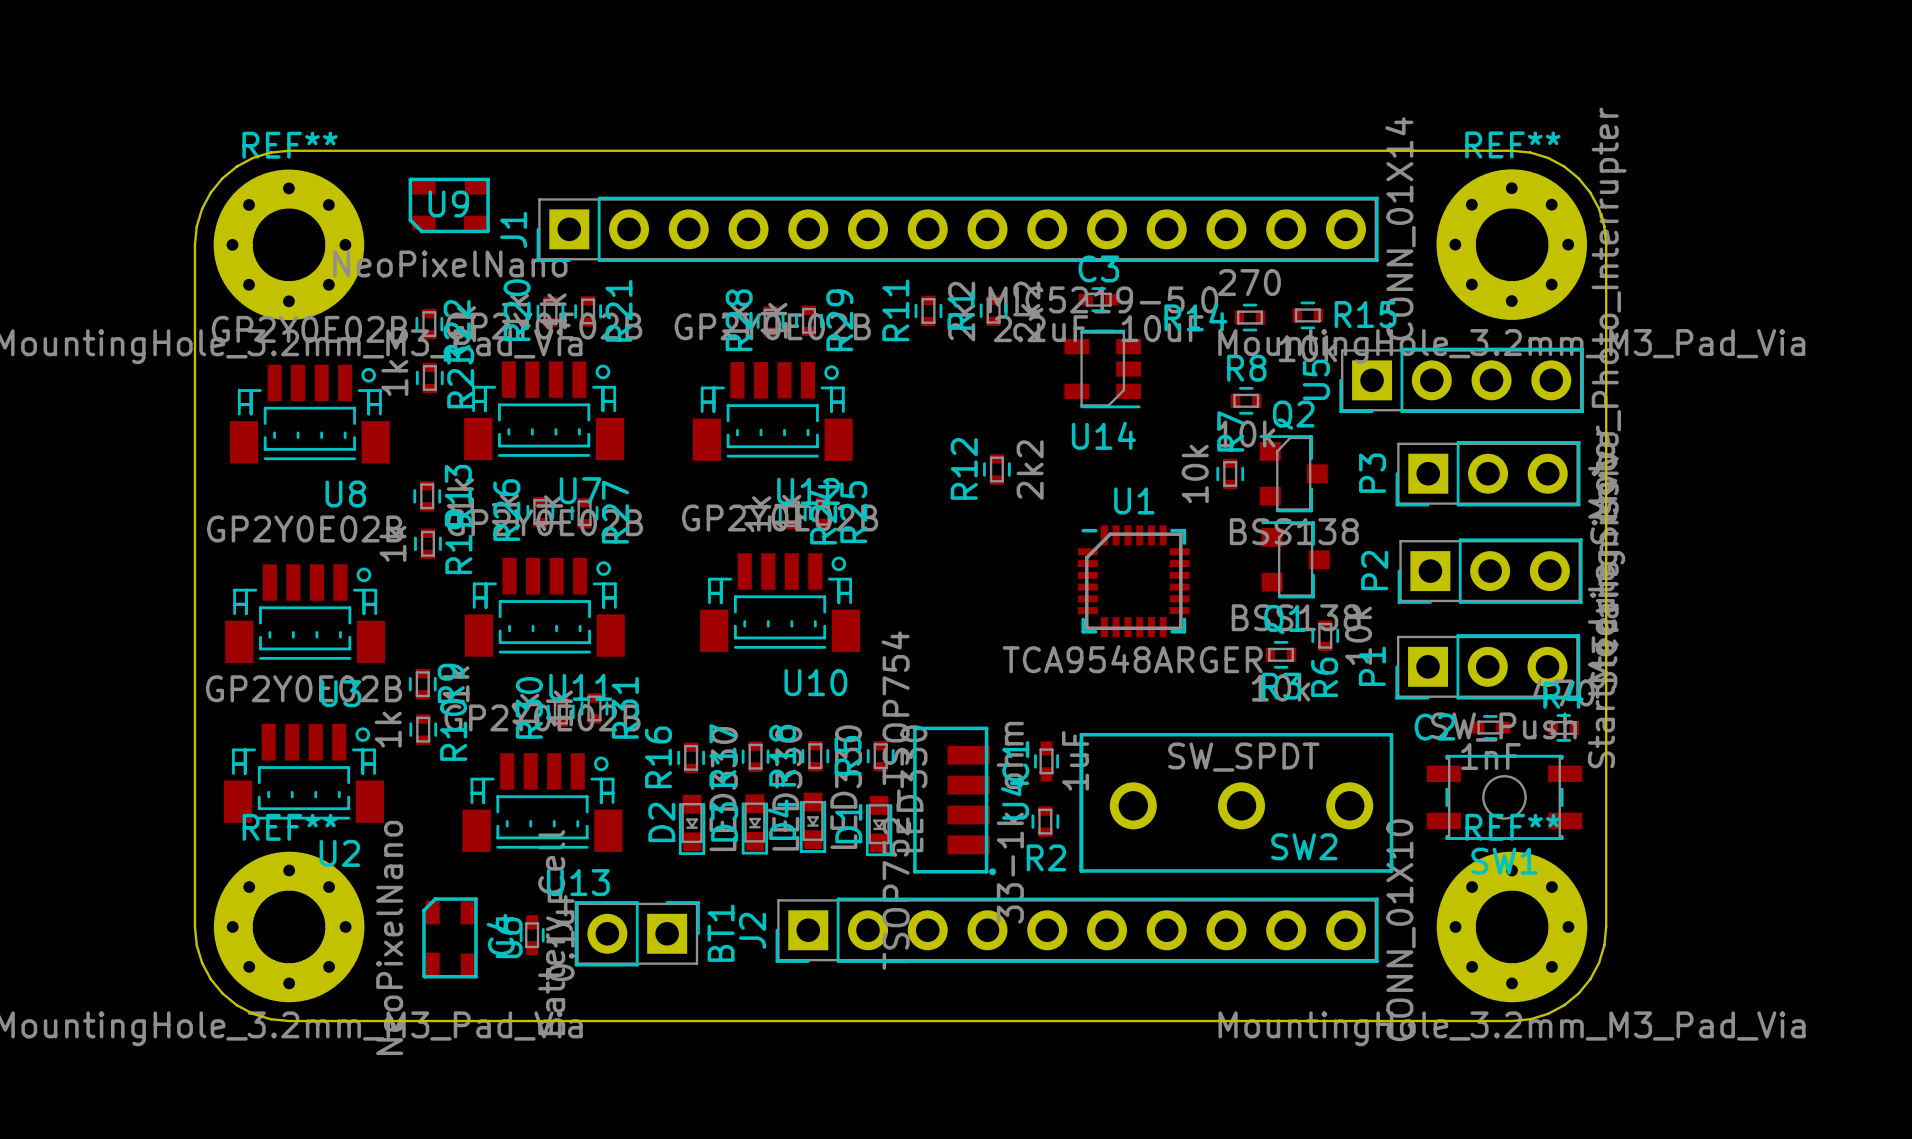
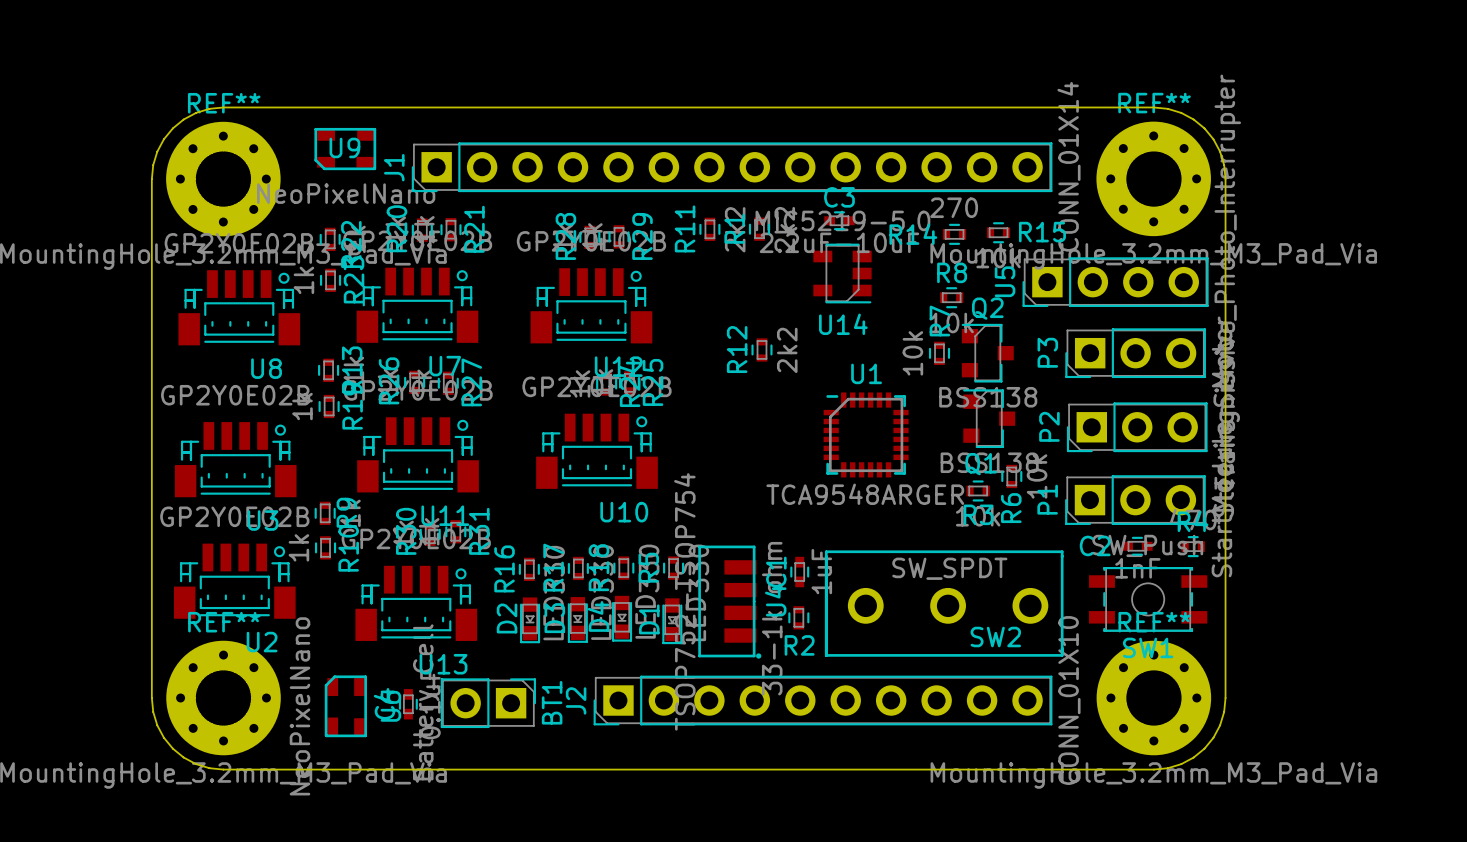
J1 footprint: [536, 196, 1379, 263] -> [411, 142, 1053, 193]
U5 footprint: [1339, 347, 1584, 414] -> [1022, 257, 1209, 308]
P3 footprint: [1395, 441, 1581, 507] -> [1065, 328, 1206, 379]
P2 footprint: [1397, 538, 1583, 604] -> [1066, 402, 1208, 453]
P1 footprint: [1395, 634, 1581, 700] -> [1065, 475, 1206, 525]
J2 footprint: [775, 897, 1379, 963] -> [593, 675, 1053, 726]
BT1 footprint: [574, 901, 700, 967] -> [440, 678, 536, 729]

